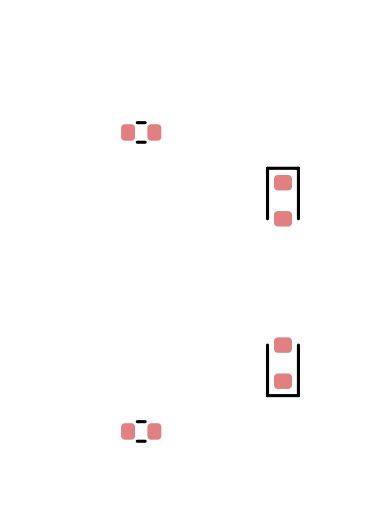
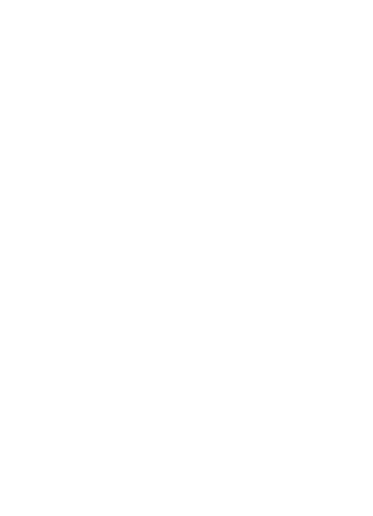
part: (141, 132) -> none
part: (282, 196) -> none
part: (282, 367) -> none
part: (141, 431) -> none

